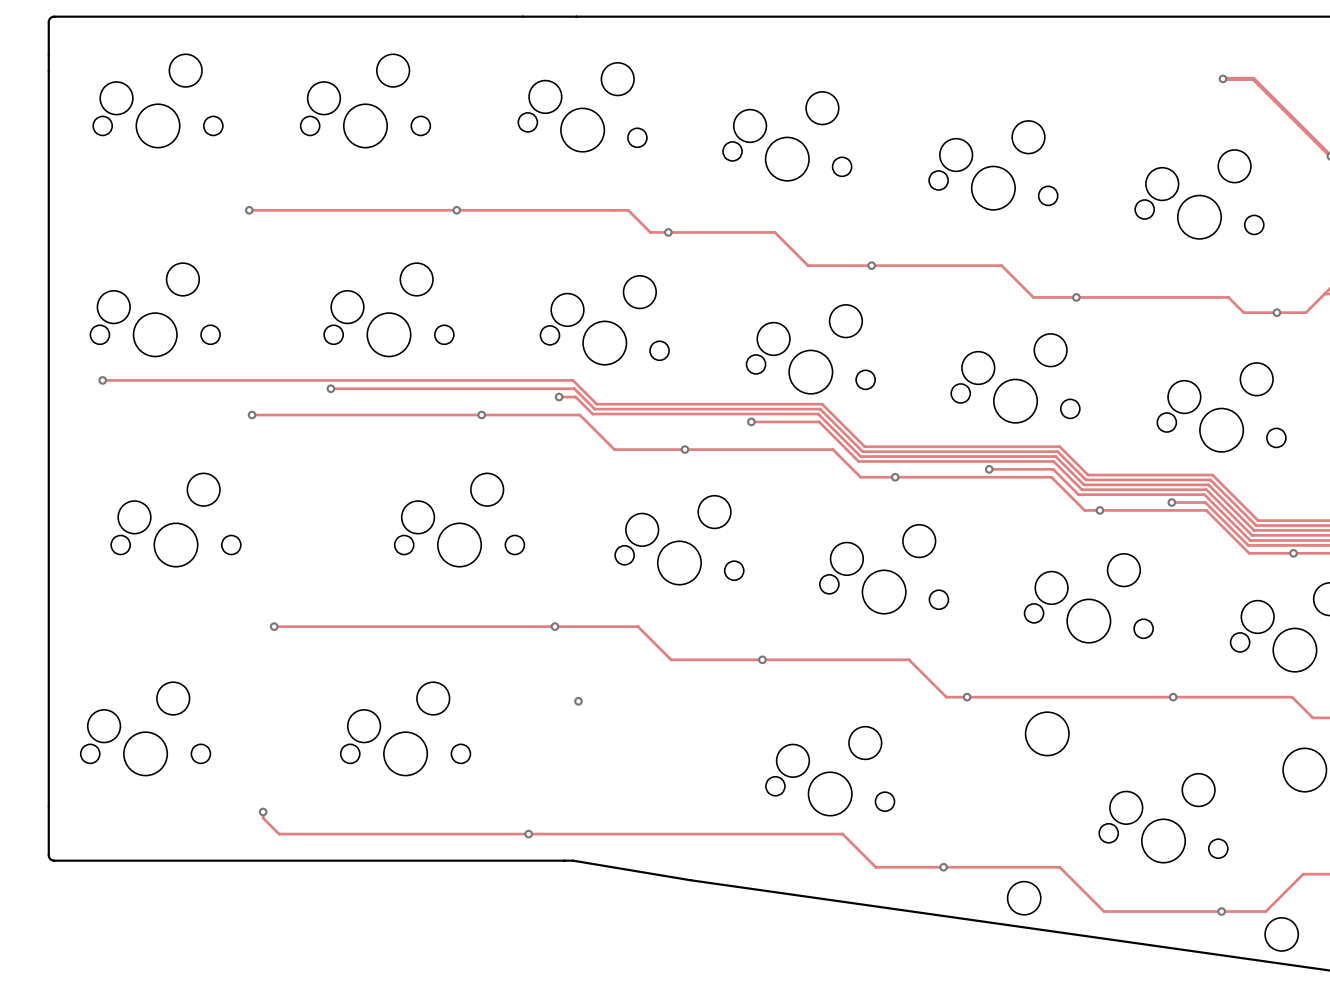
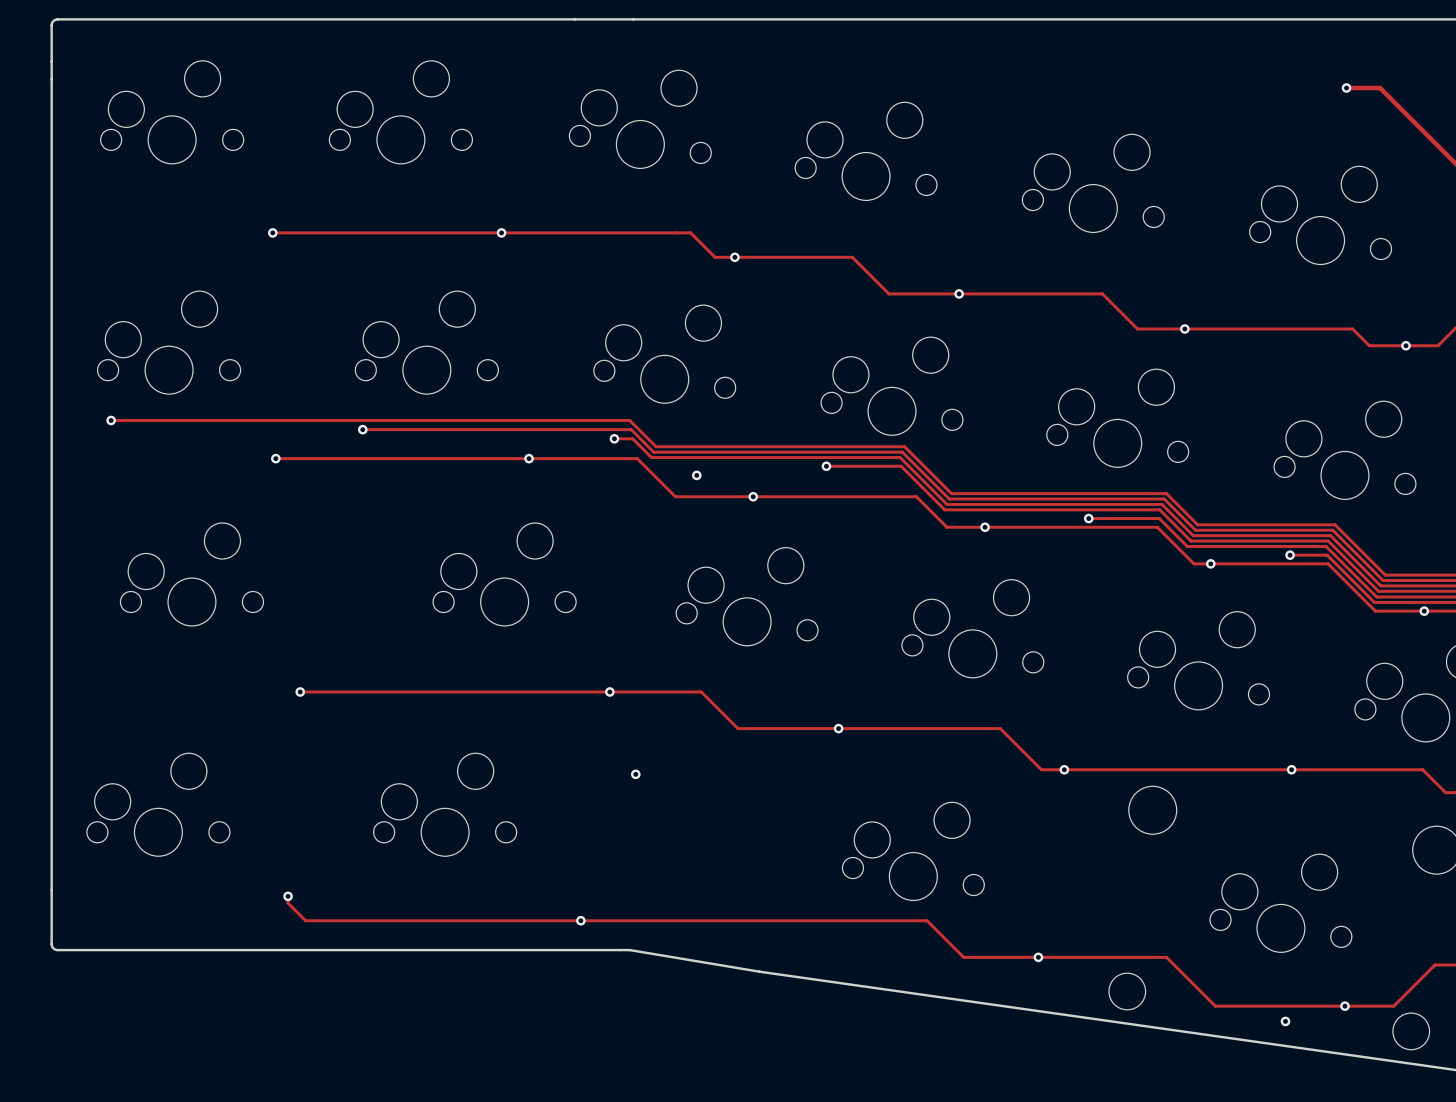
via: none -> (696, 475)
via: none -> (1285, 1021)

